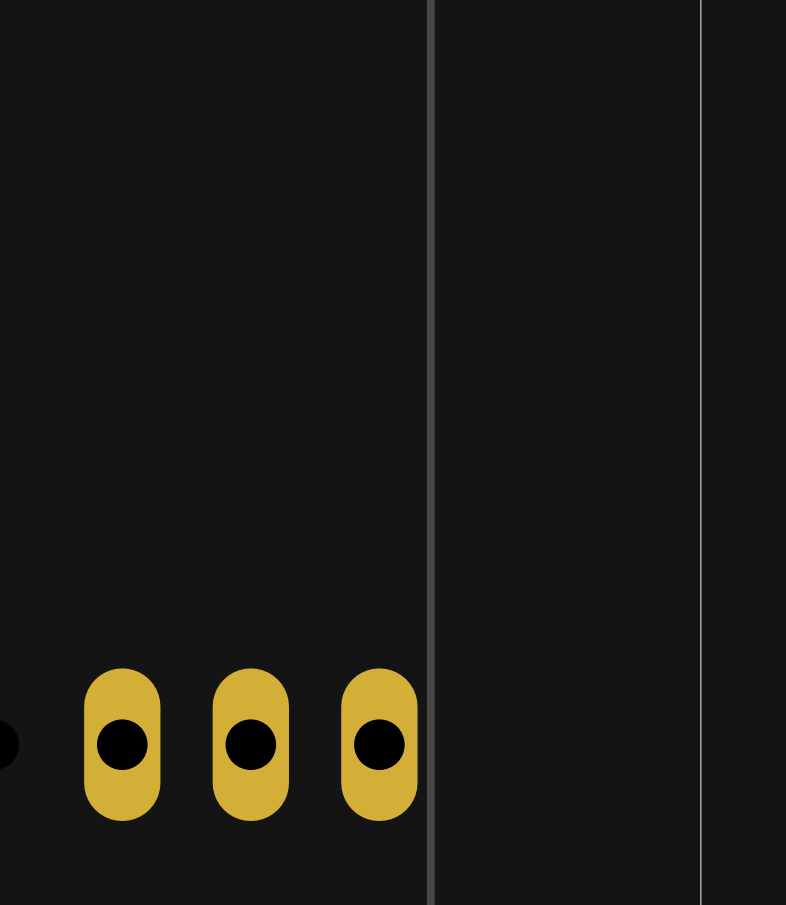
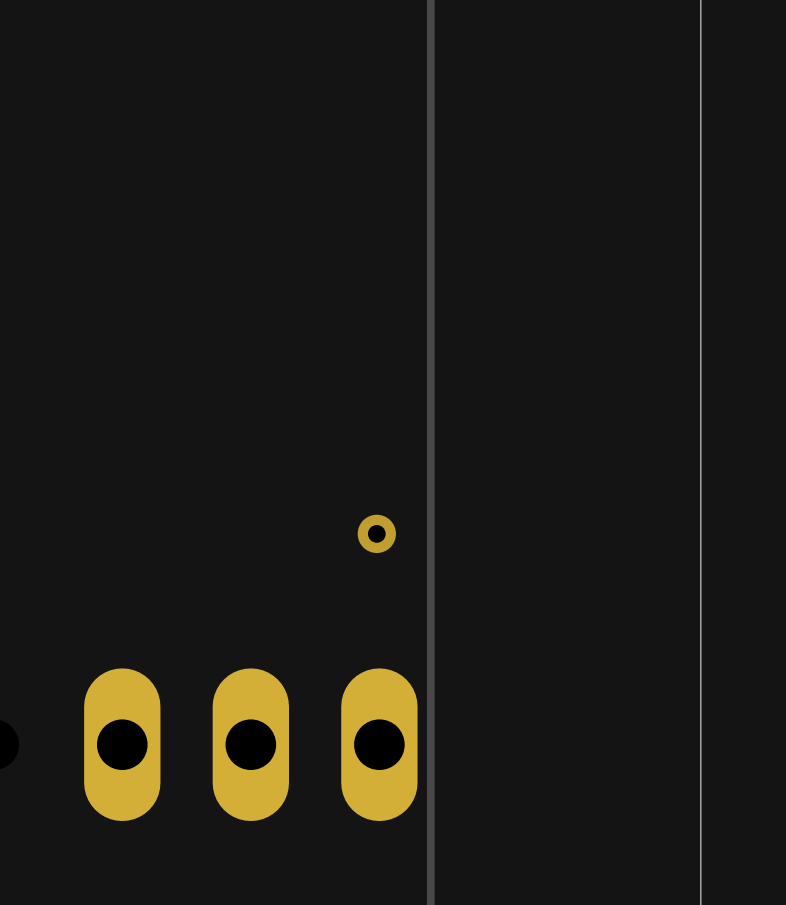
via: none -> (376, 533)

